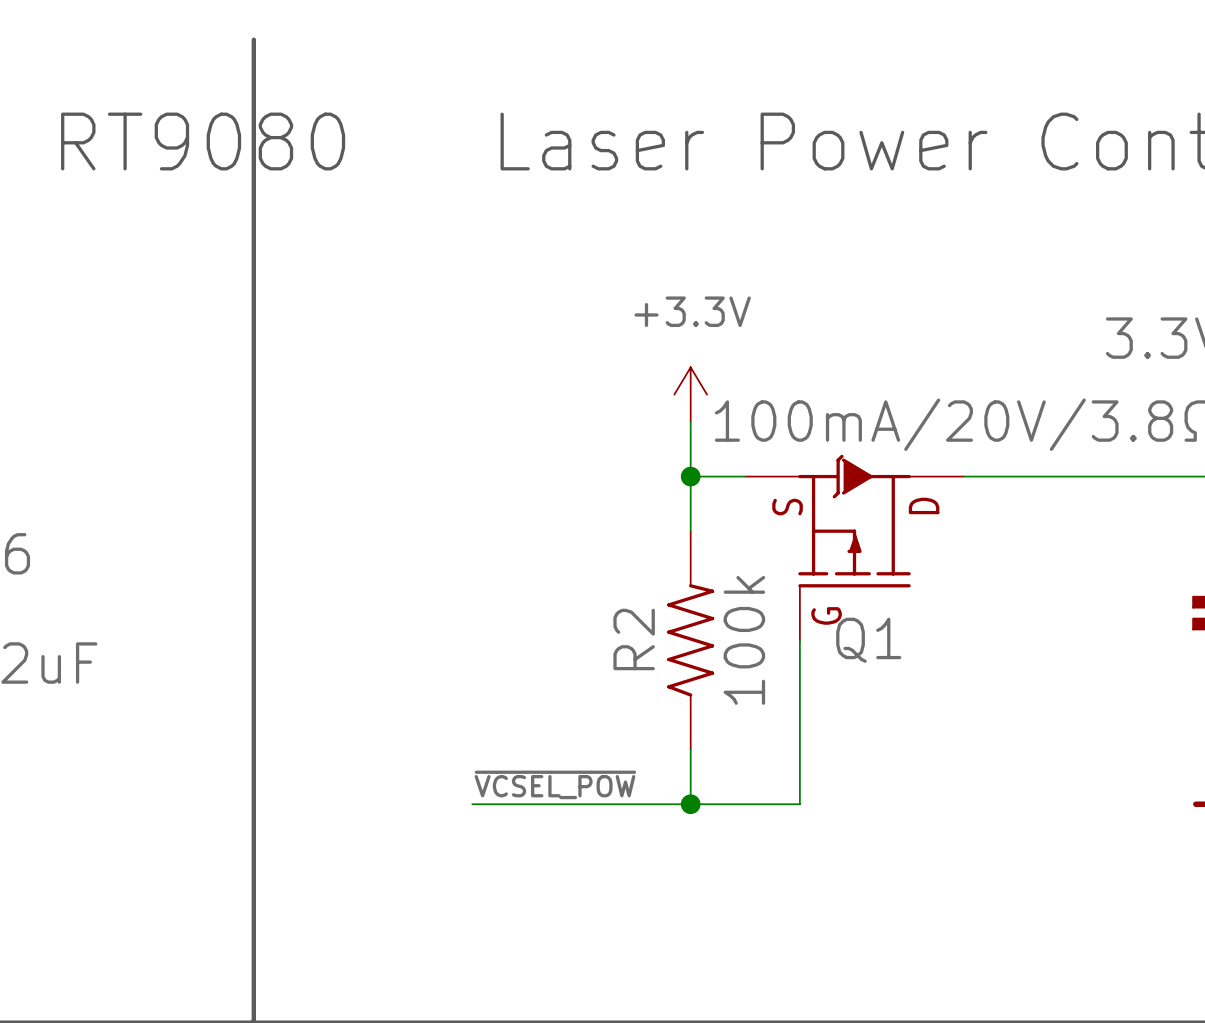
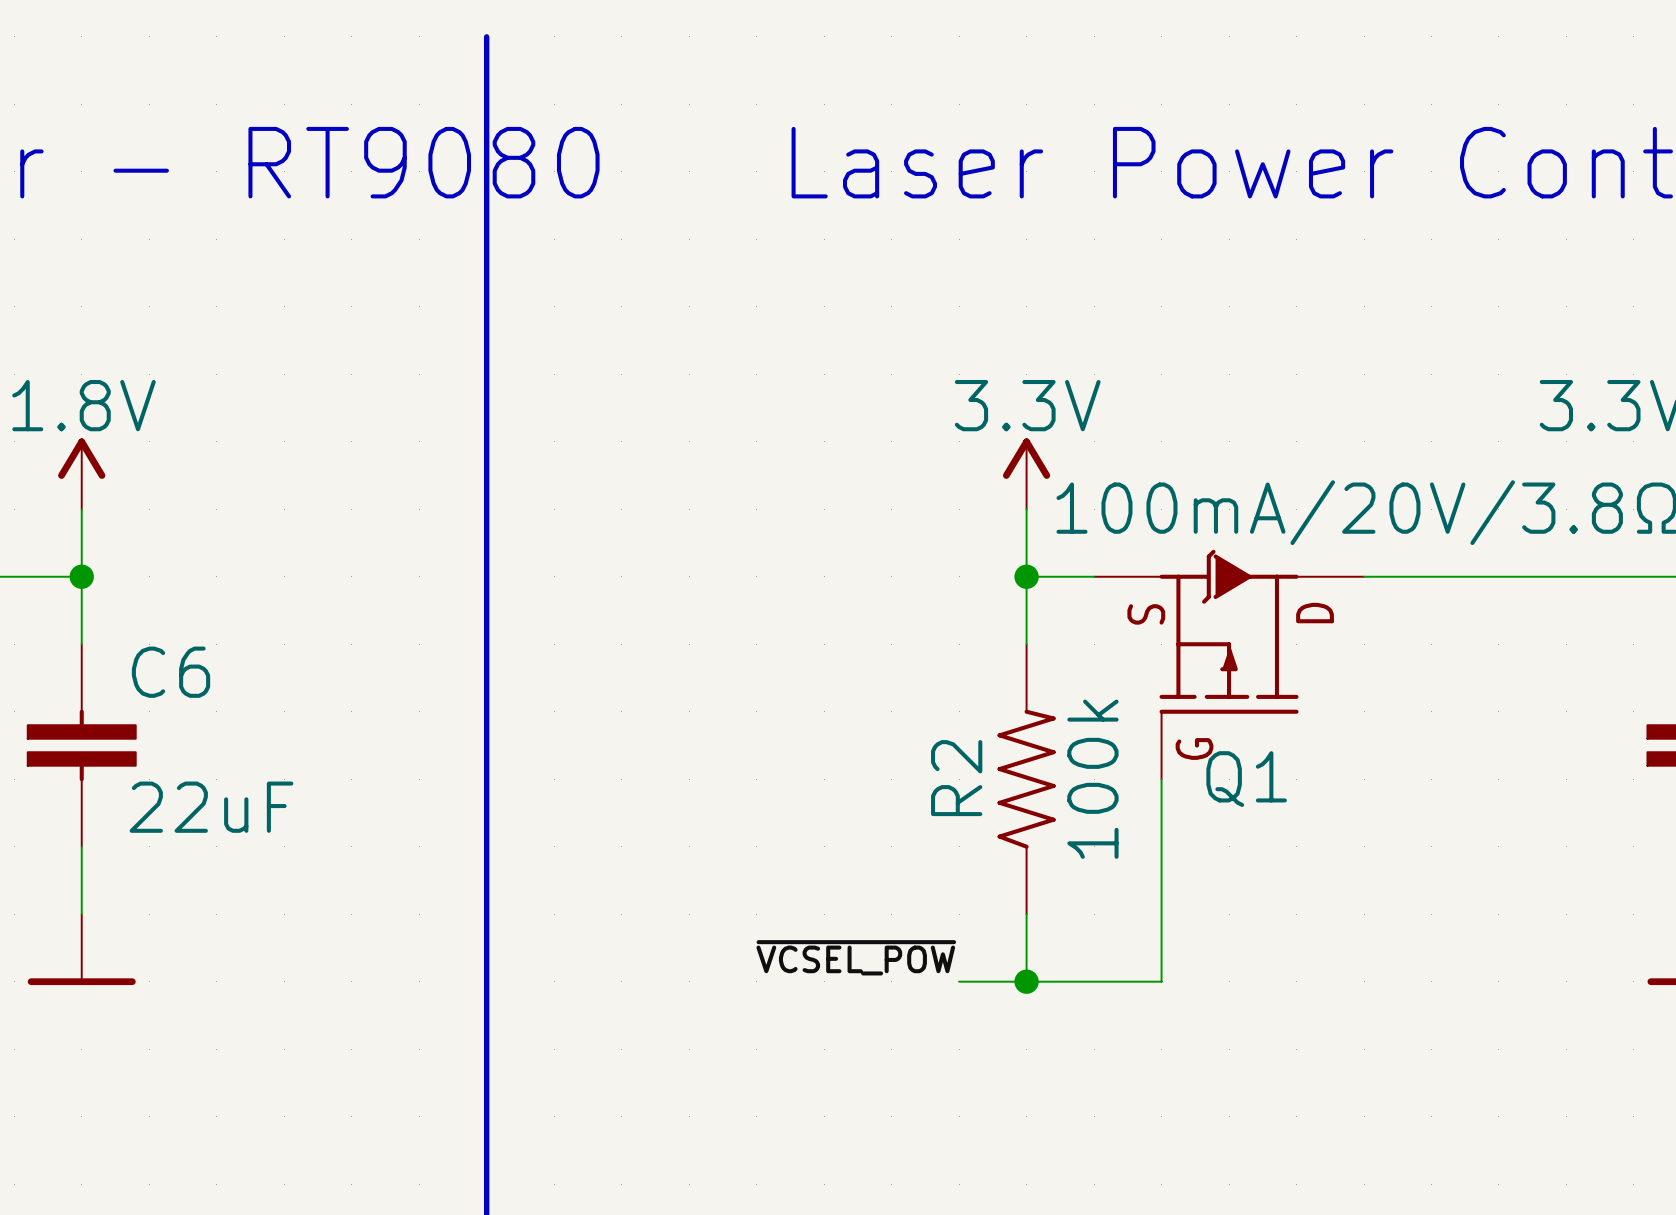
power symbol: +3.3V (690, 394) -> 3.3V (1026, 473)
label position: ~{VCSEL_POW} (555, 784) -> ~{VCSEL_POW} (856, 957)
wire: (472, 804) (636, 804) -> none

